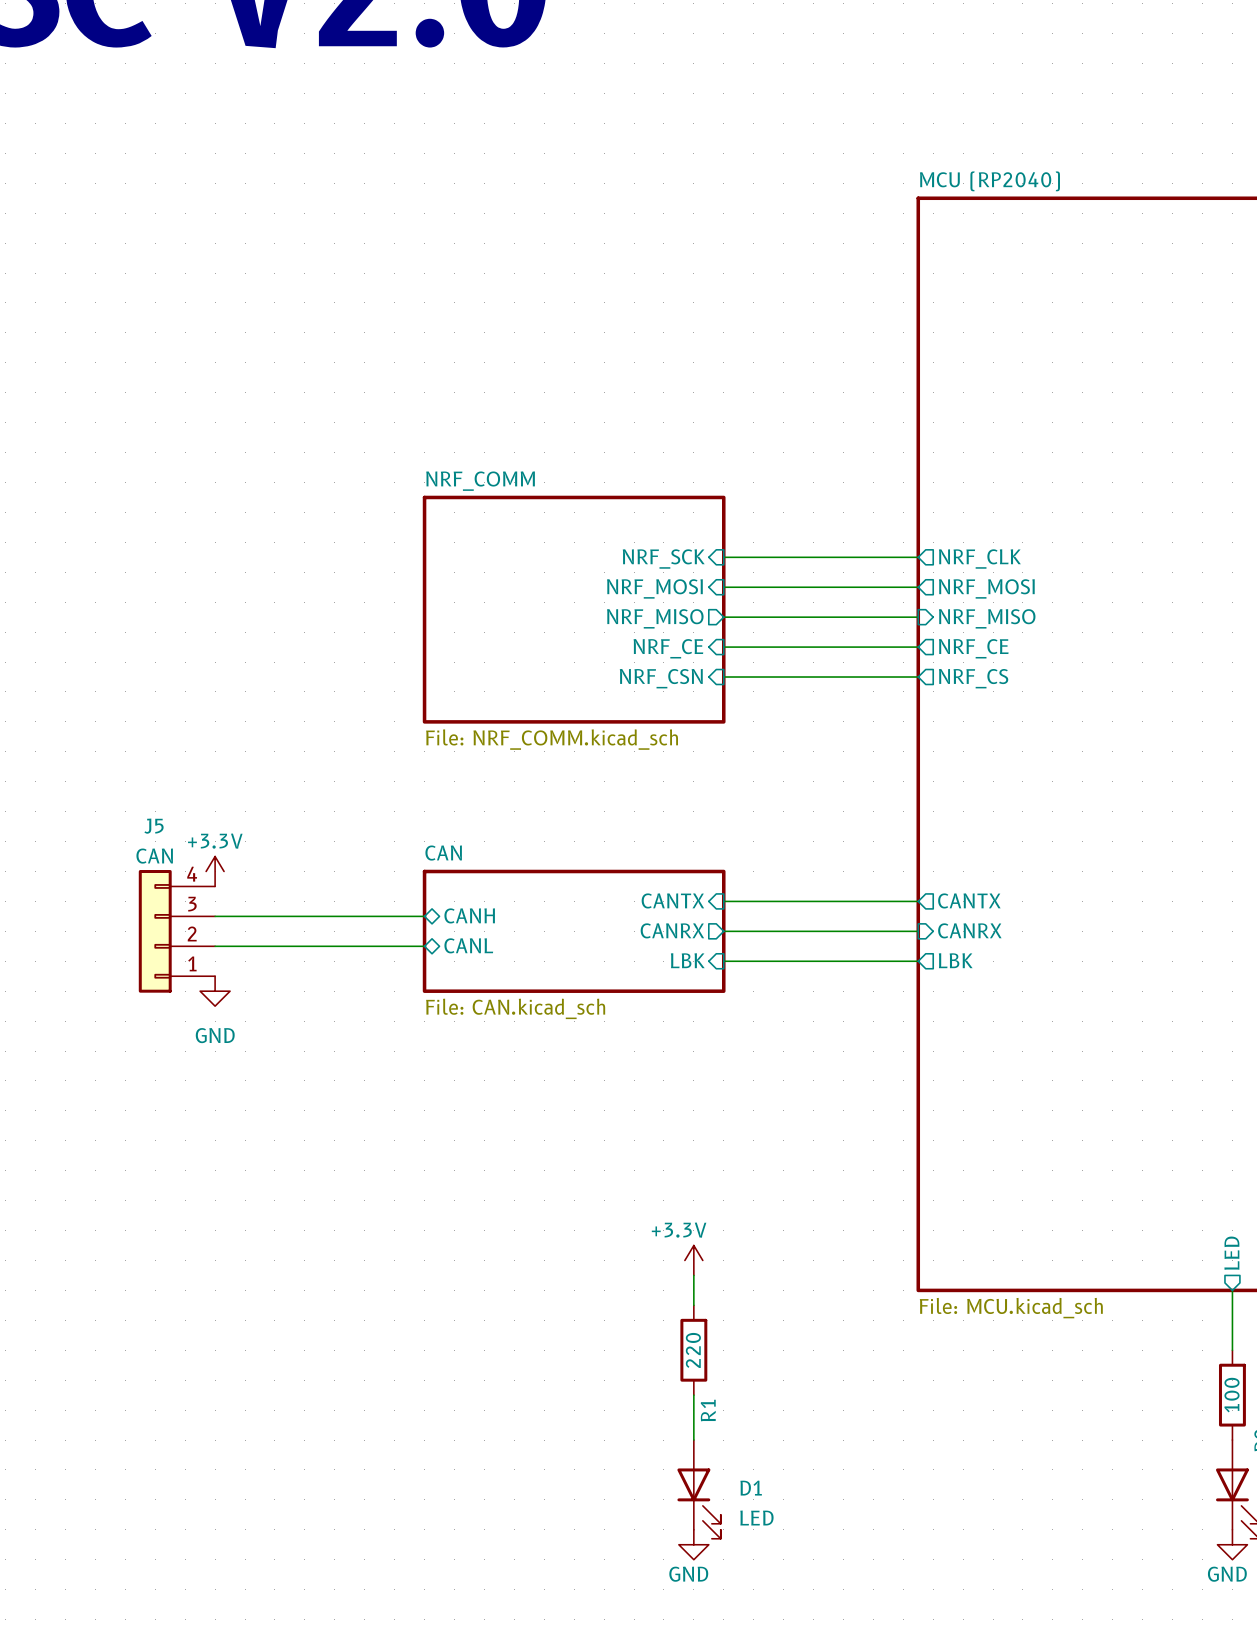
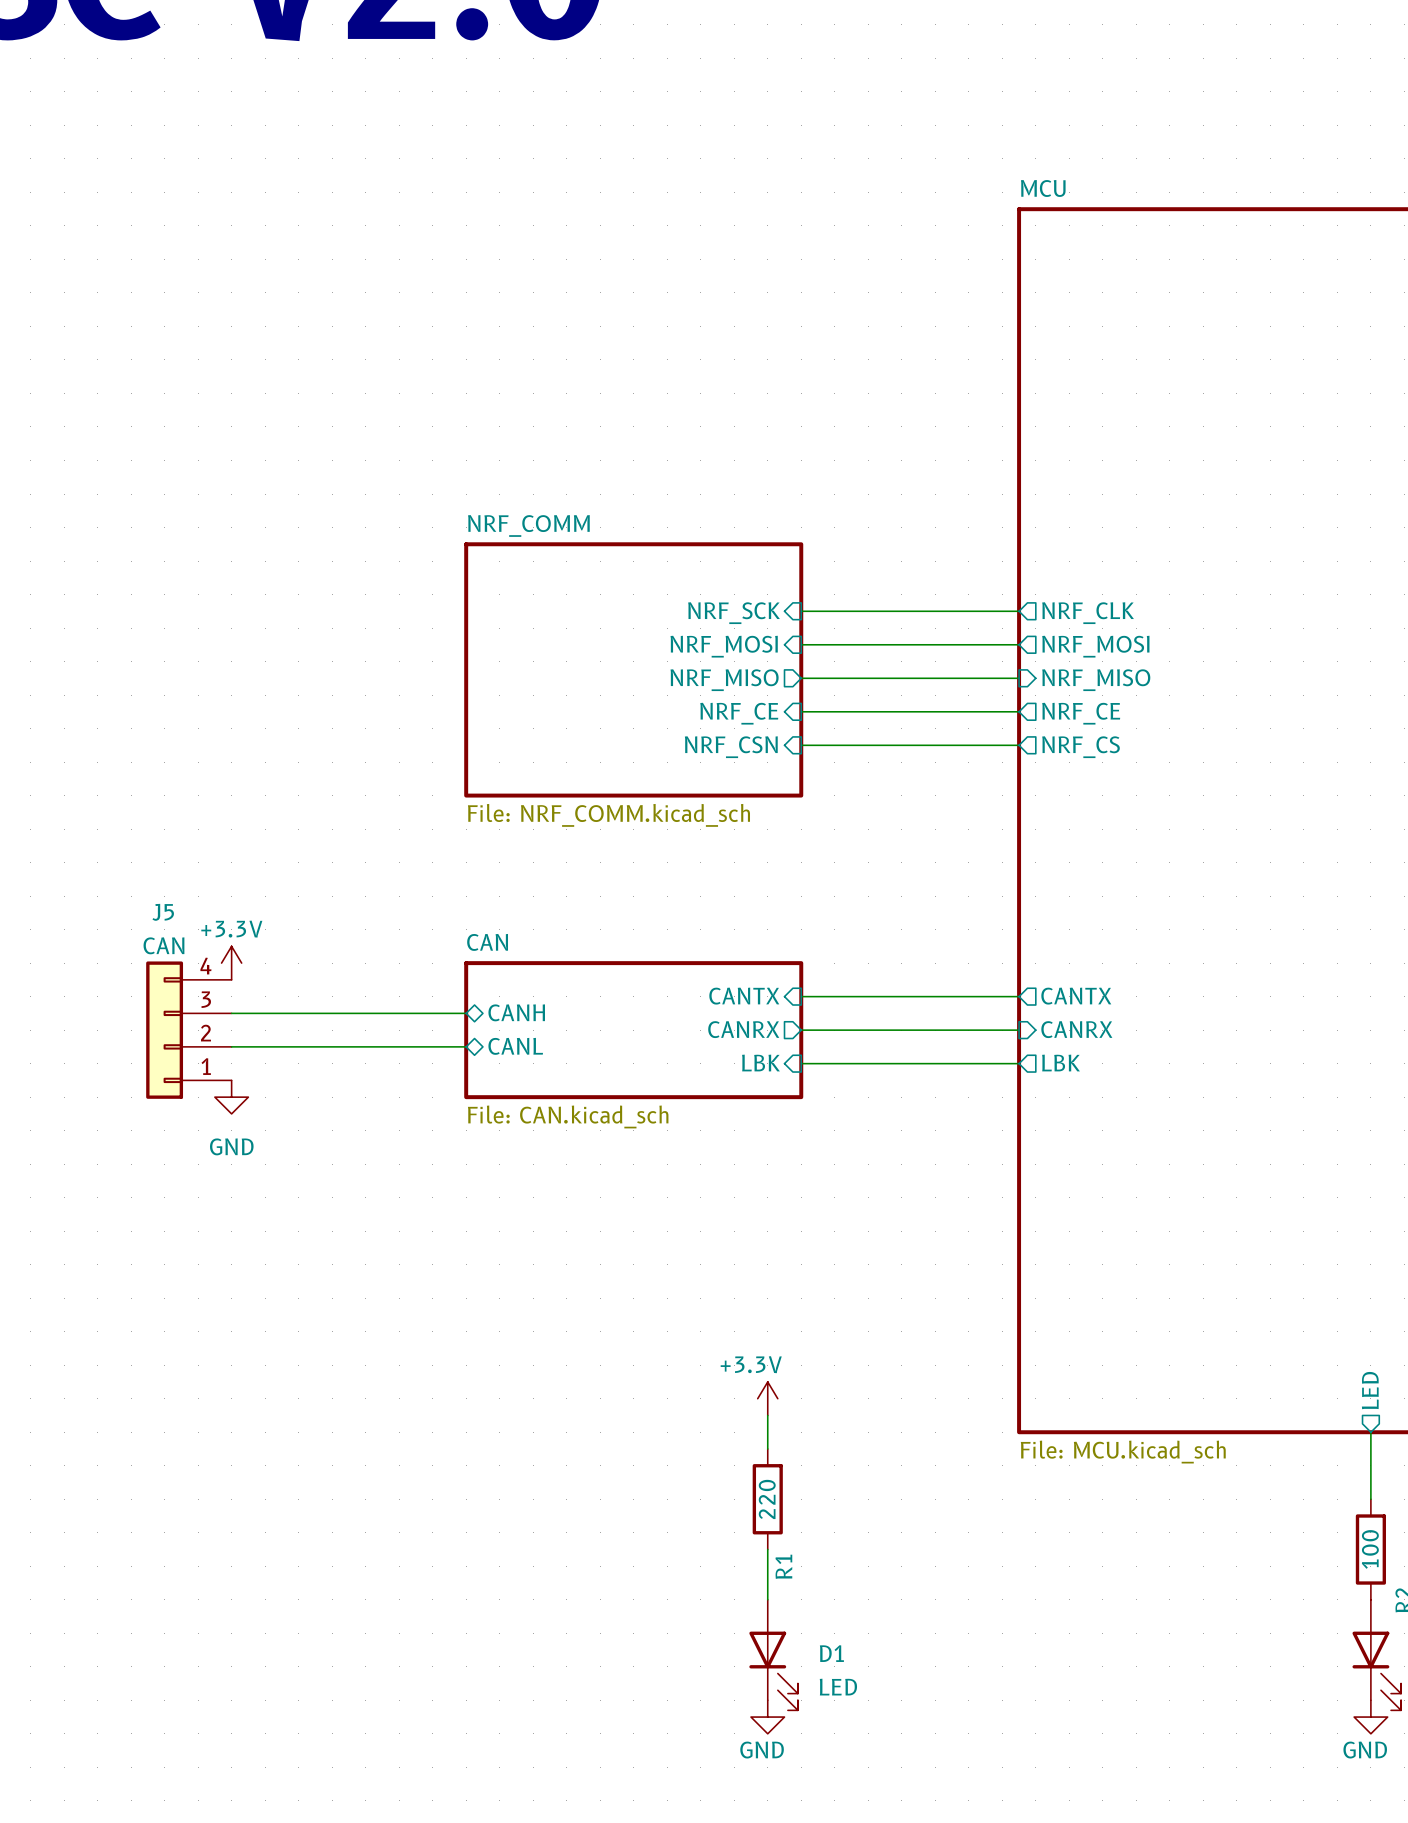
sheet MCU (RP2040) name: MCU (RP2040) (989, 181) -> MCU (1043, 188)

